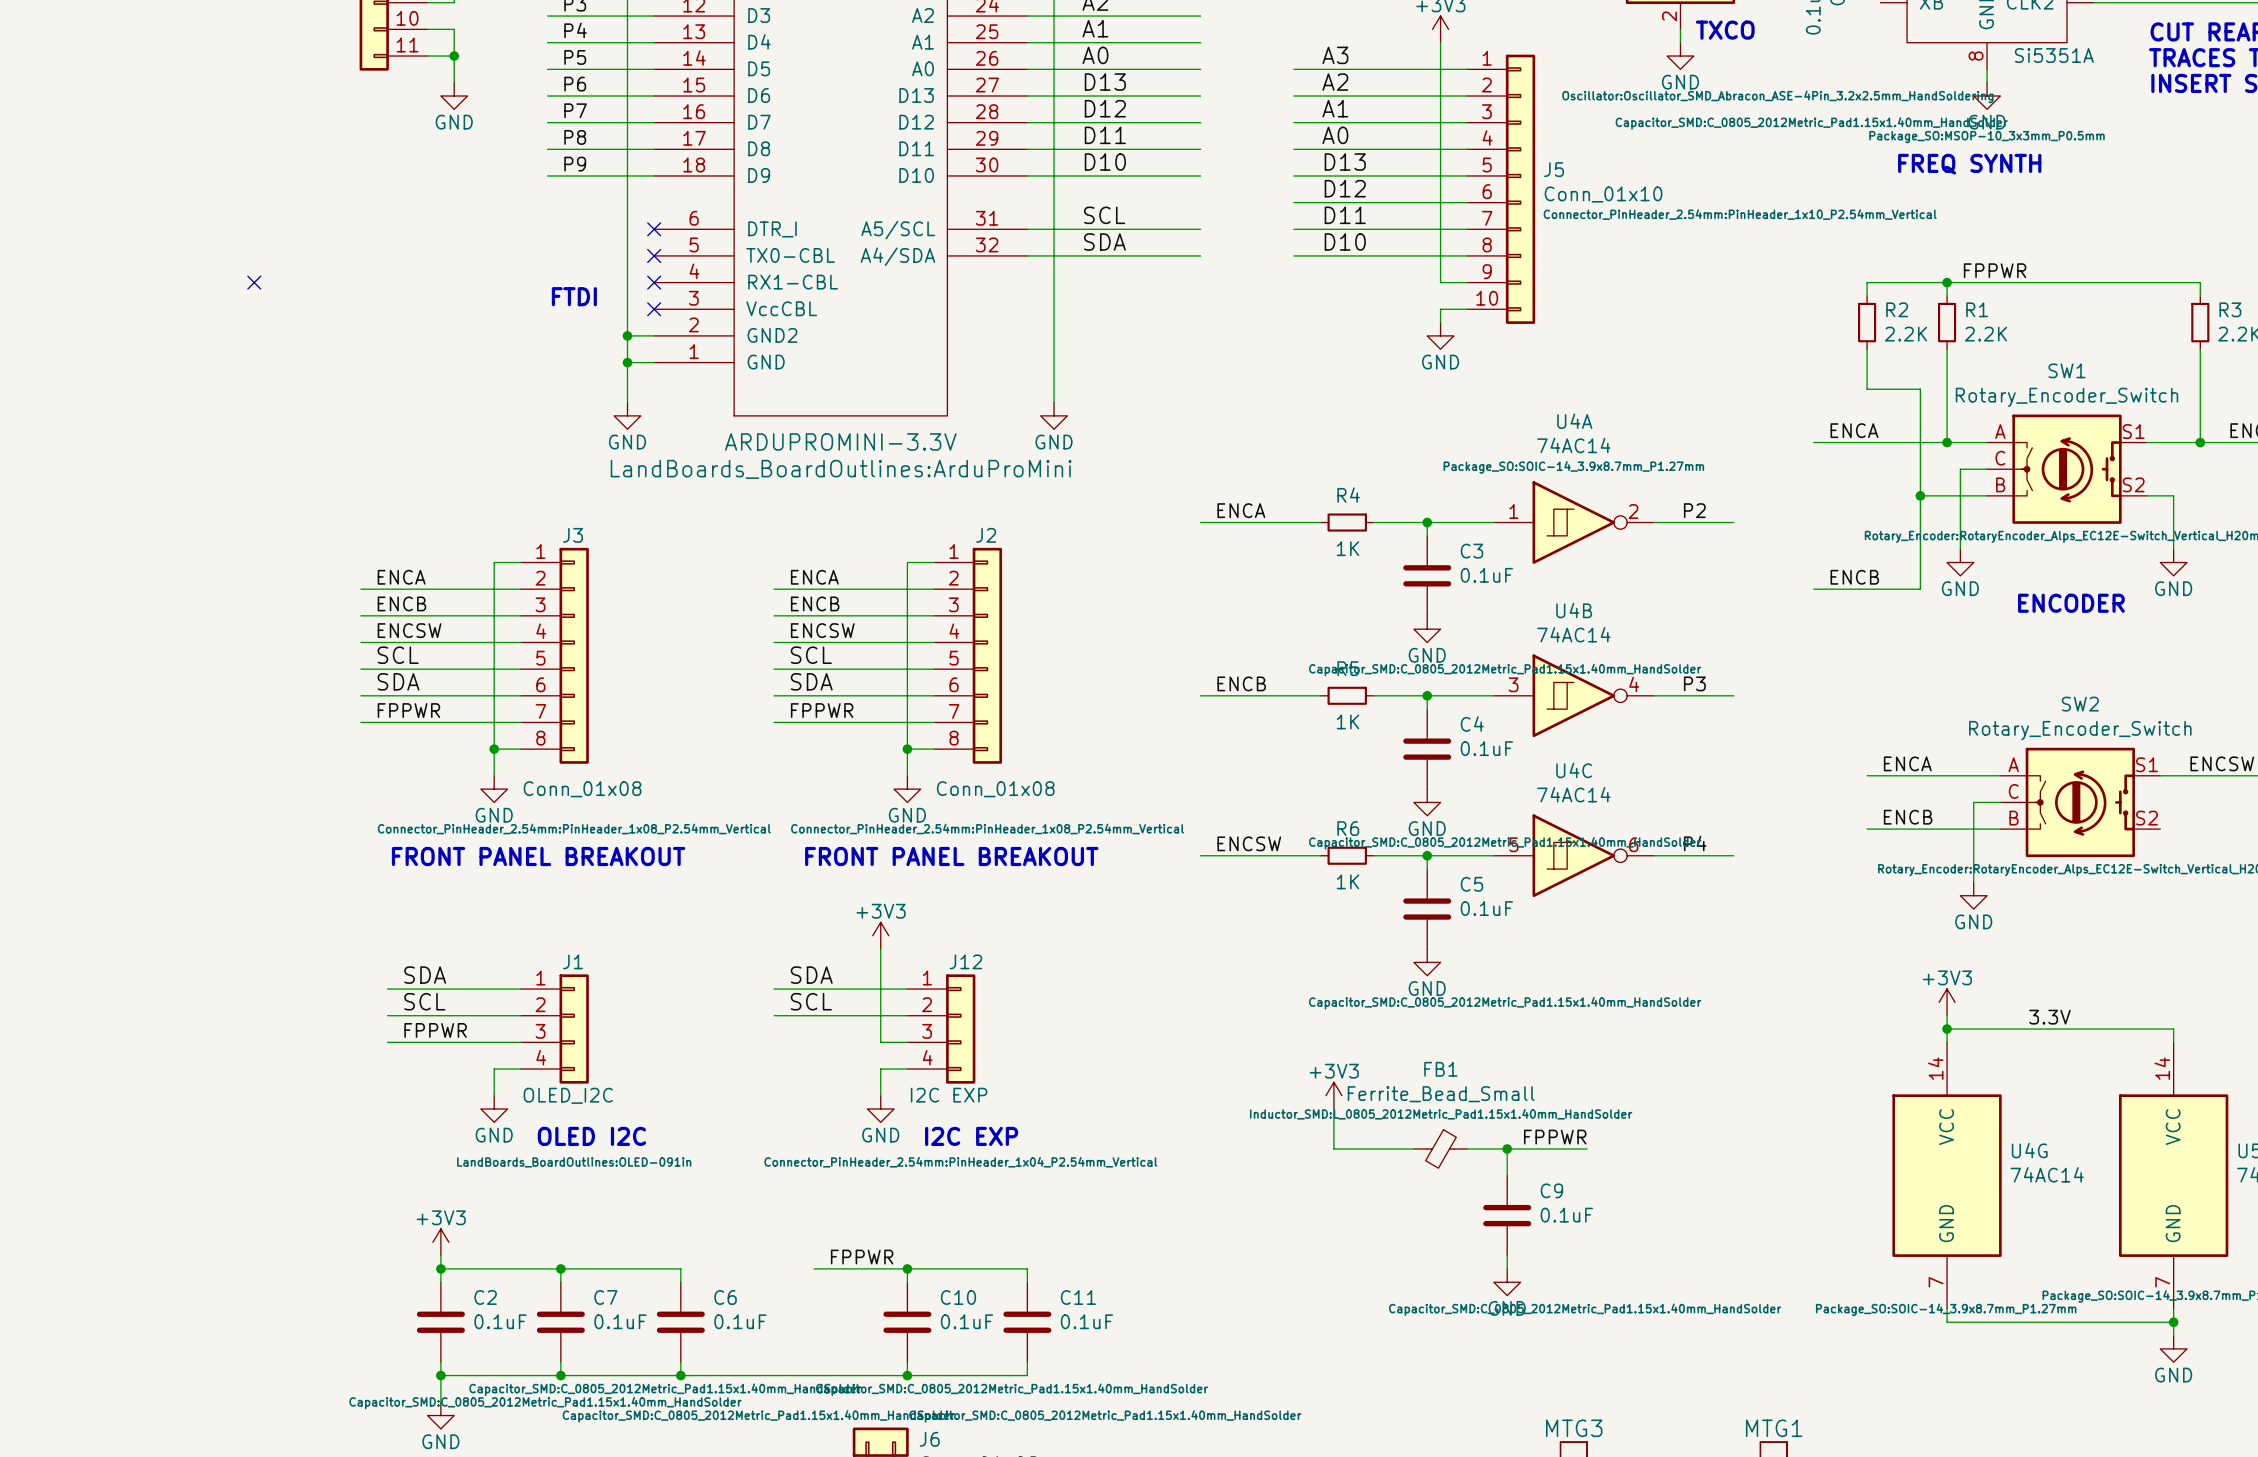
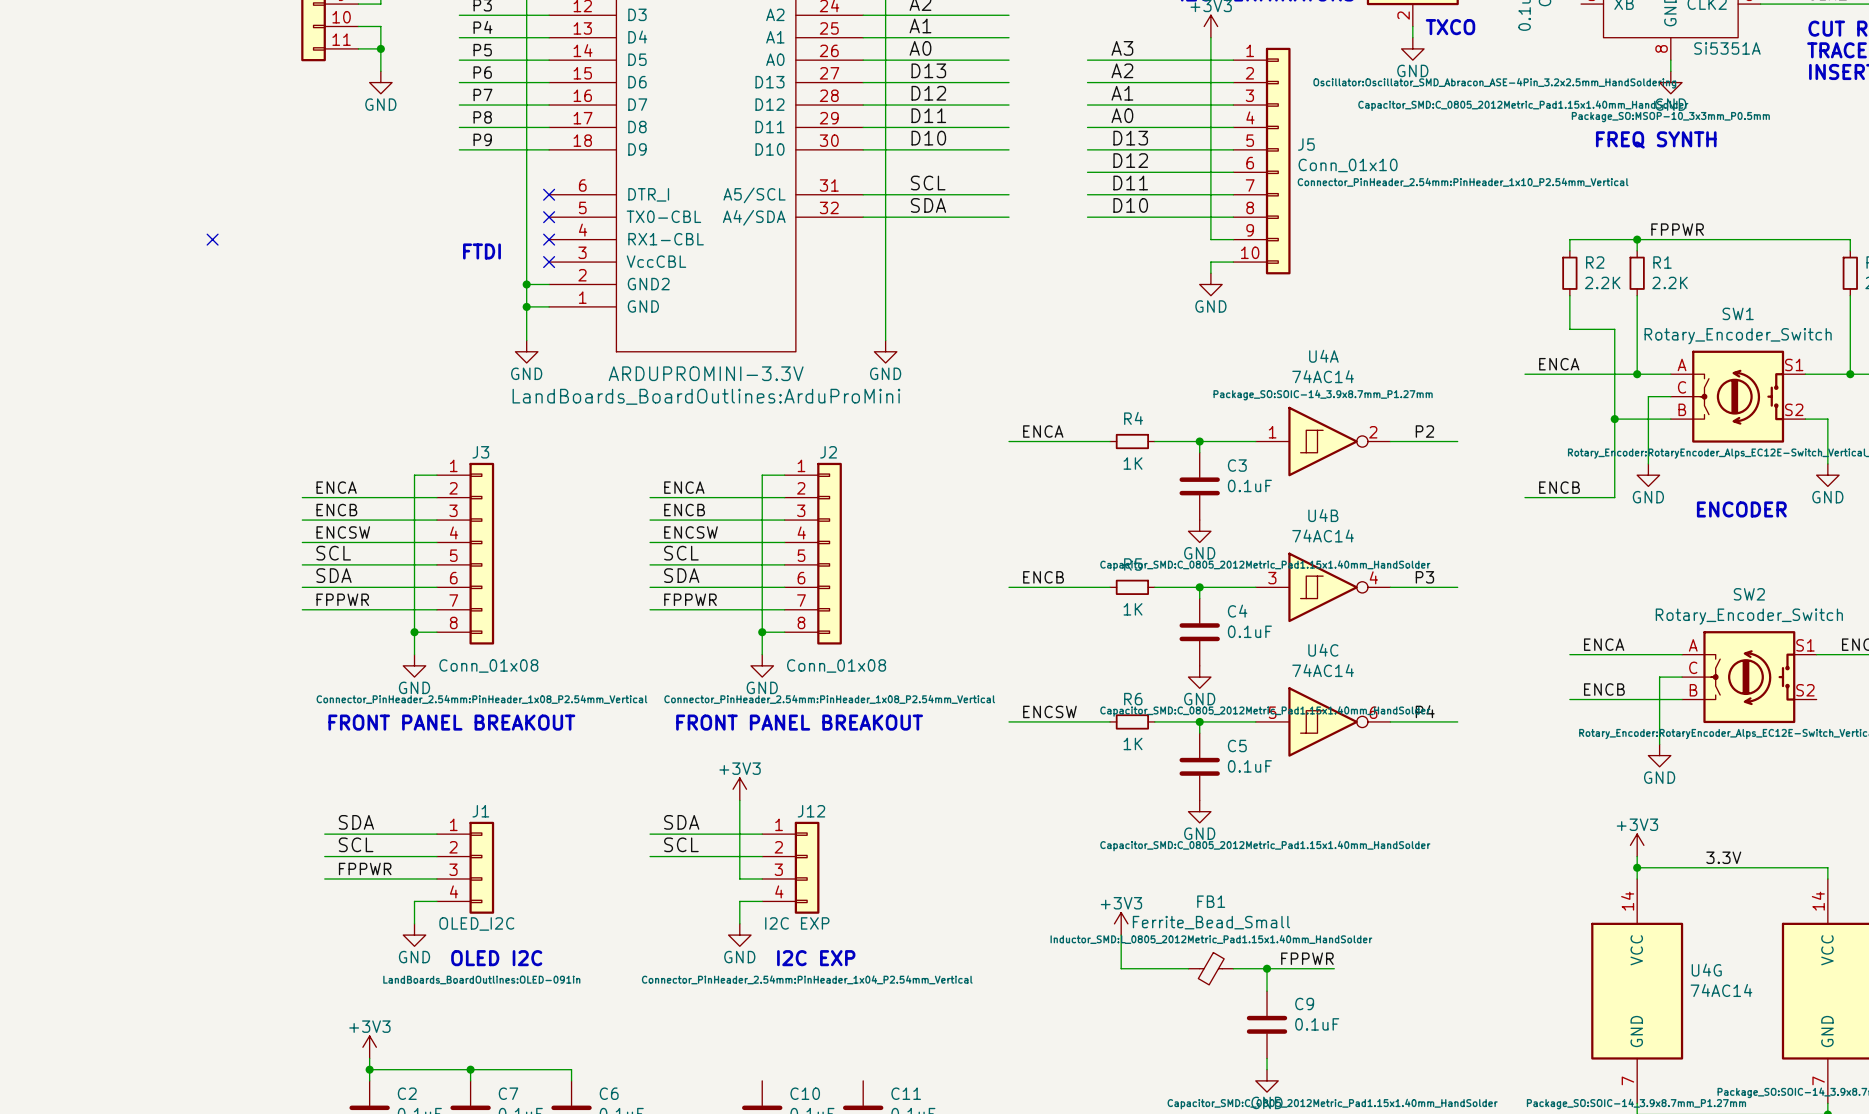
label: FPPWR (862, 1257) -> none
wire: (814, 1268) (1027, 1268) (1027, 1282) -> none
wire: (907, 1268) (907, 1282) -> none
junction: (907, 1268) -> none

